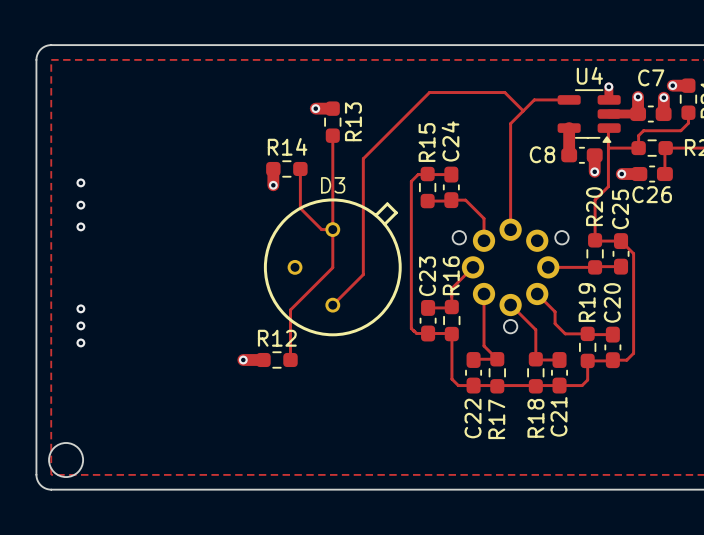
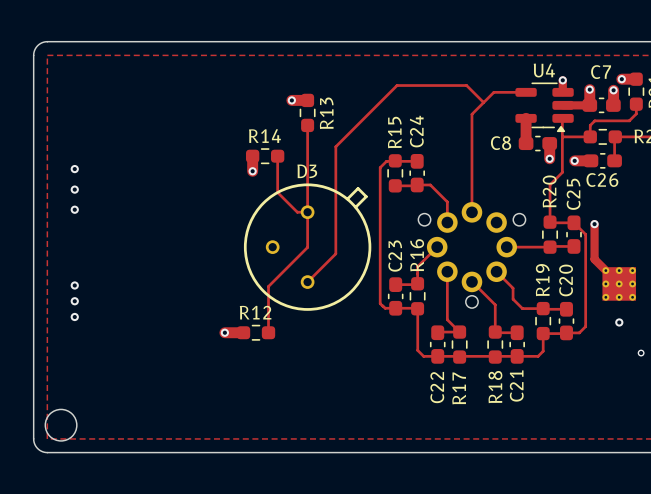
track: none -> (594, 224) (594, 259) (619, 283)
via: none -> (594, 224)
part: none -> (619, 283)
via: none -> (619, 322)
via: none -> (641, 353)

